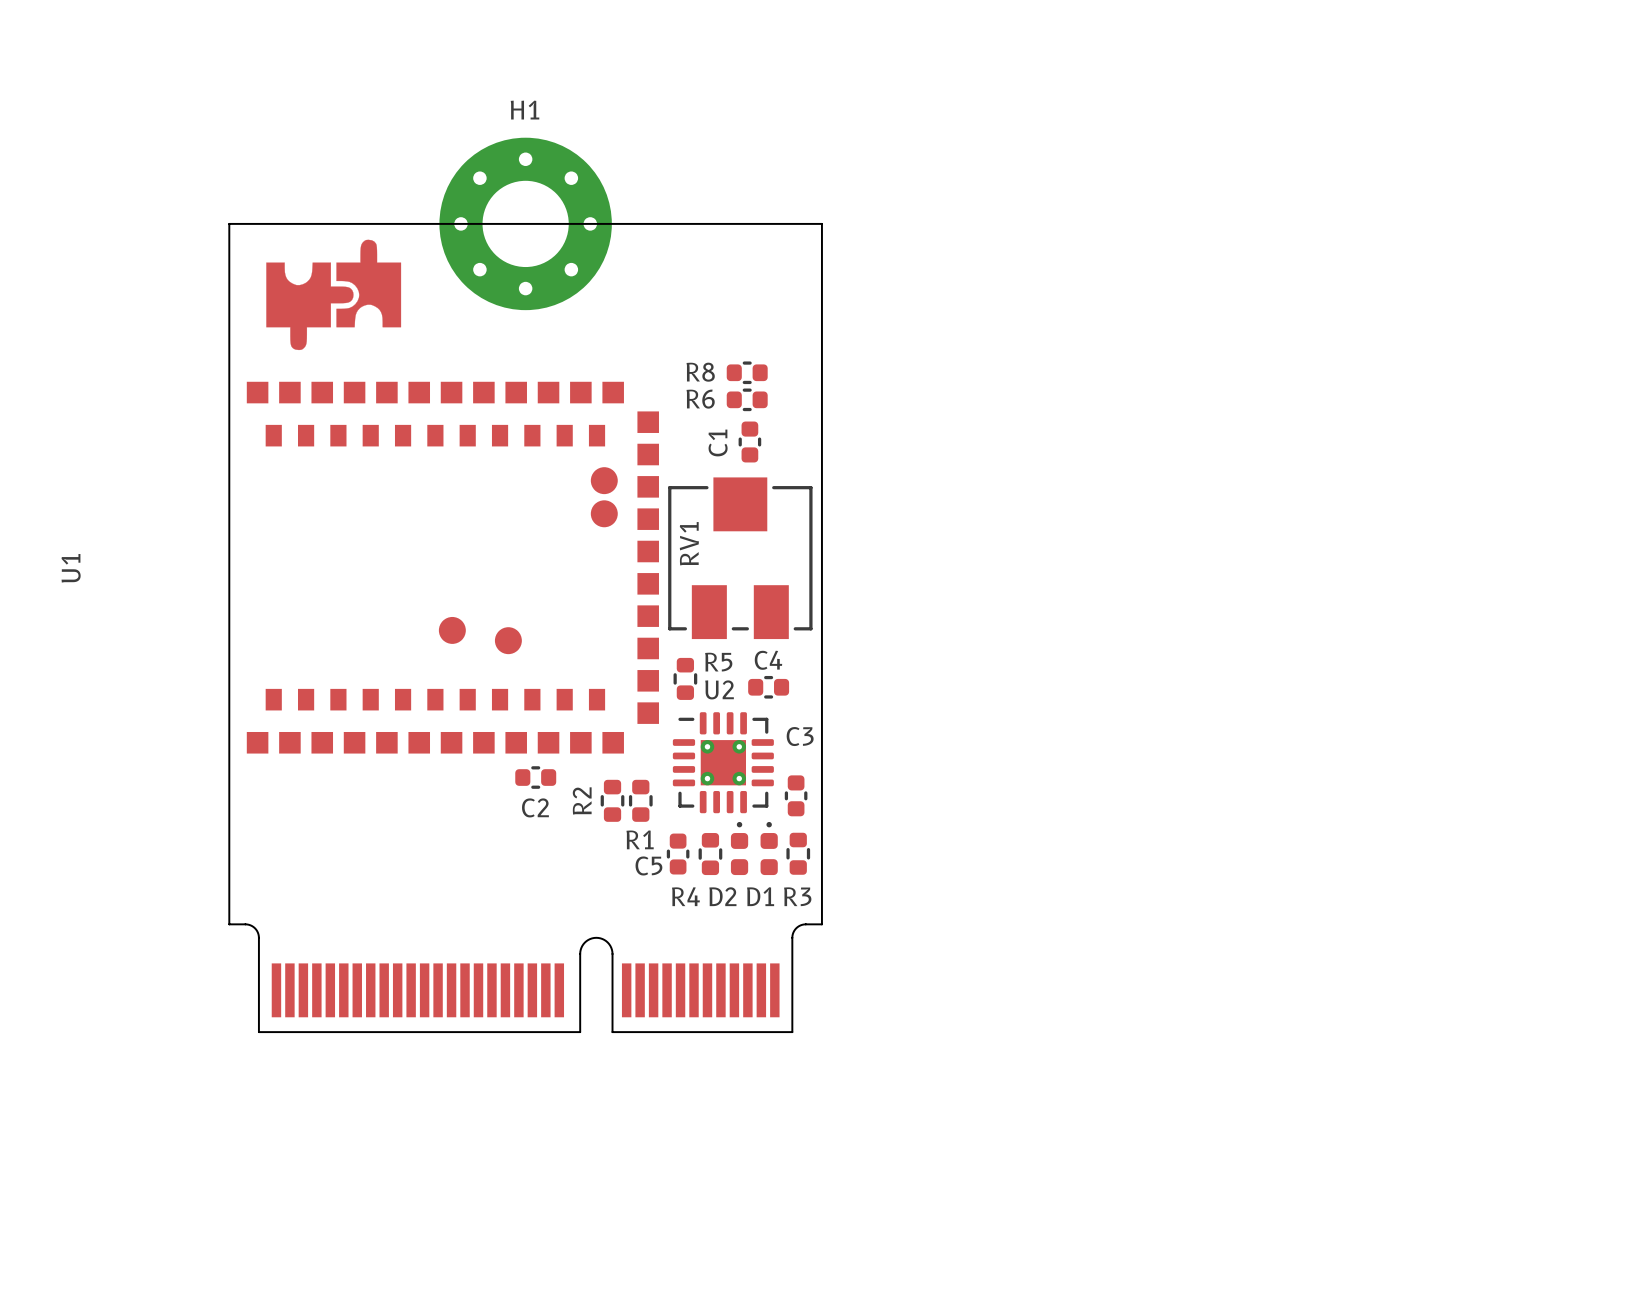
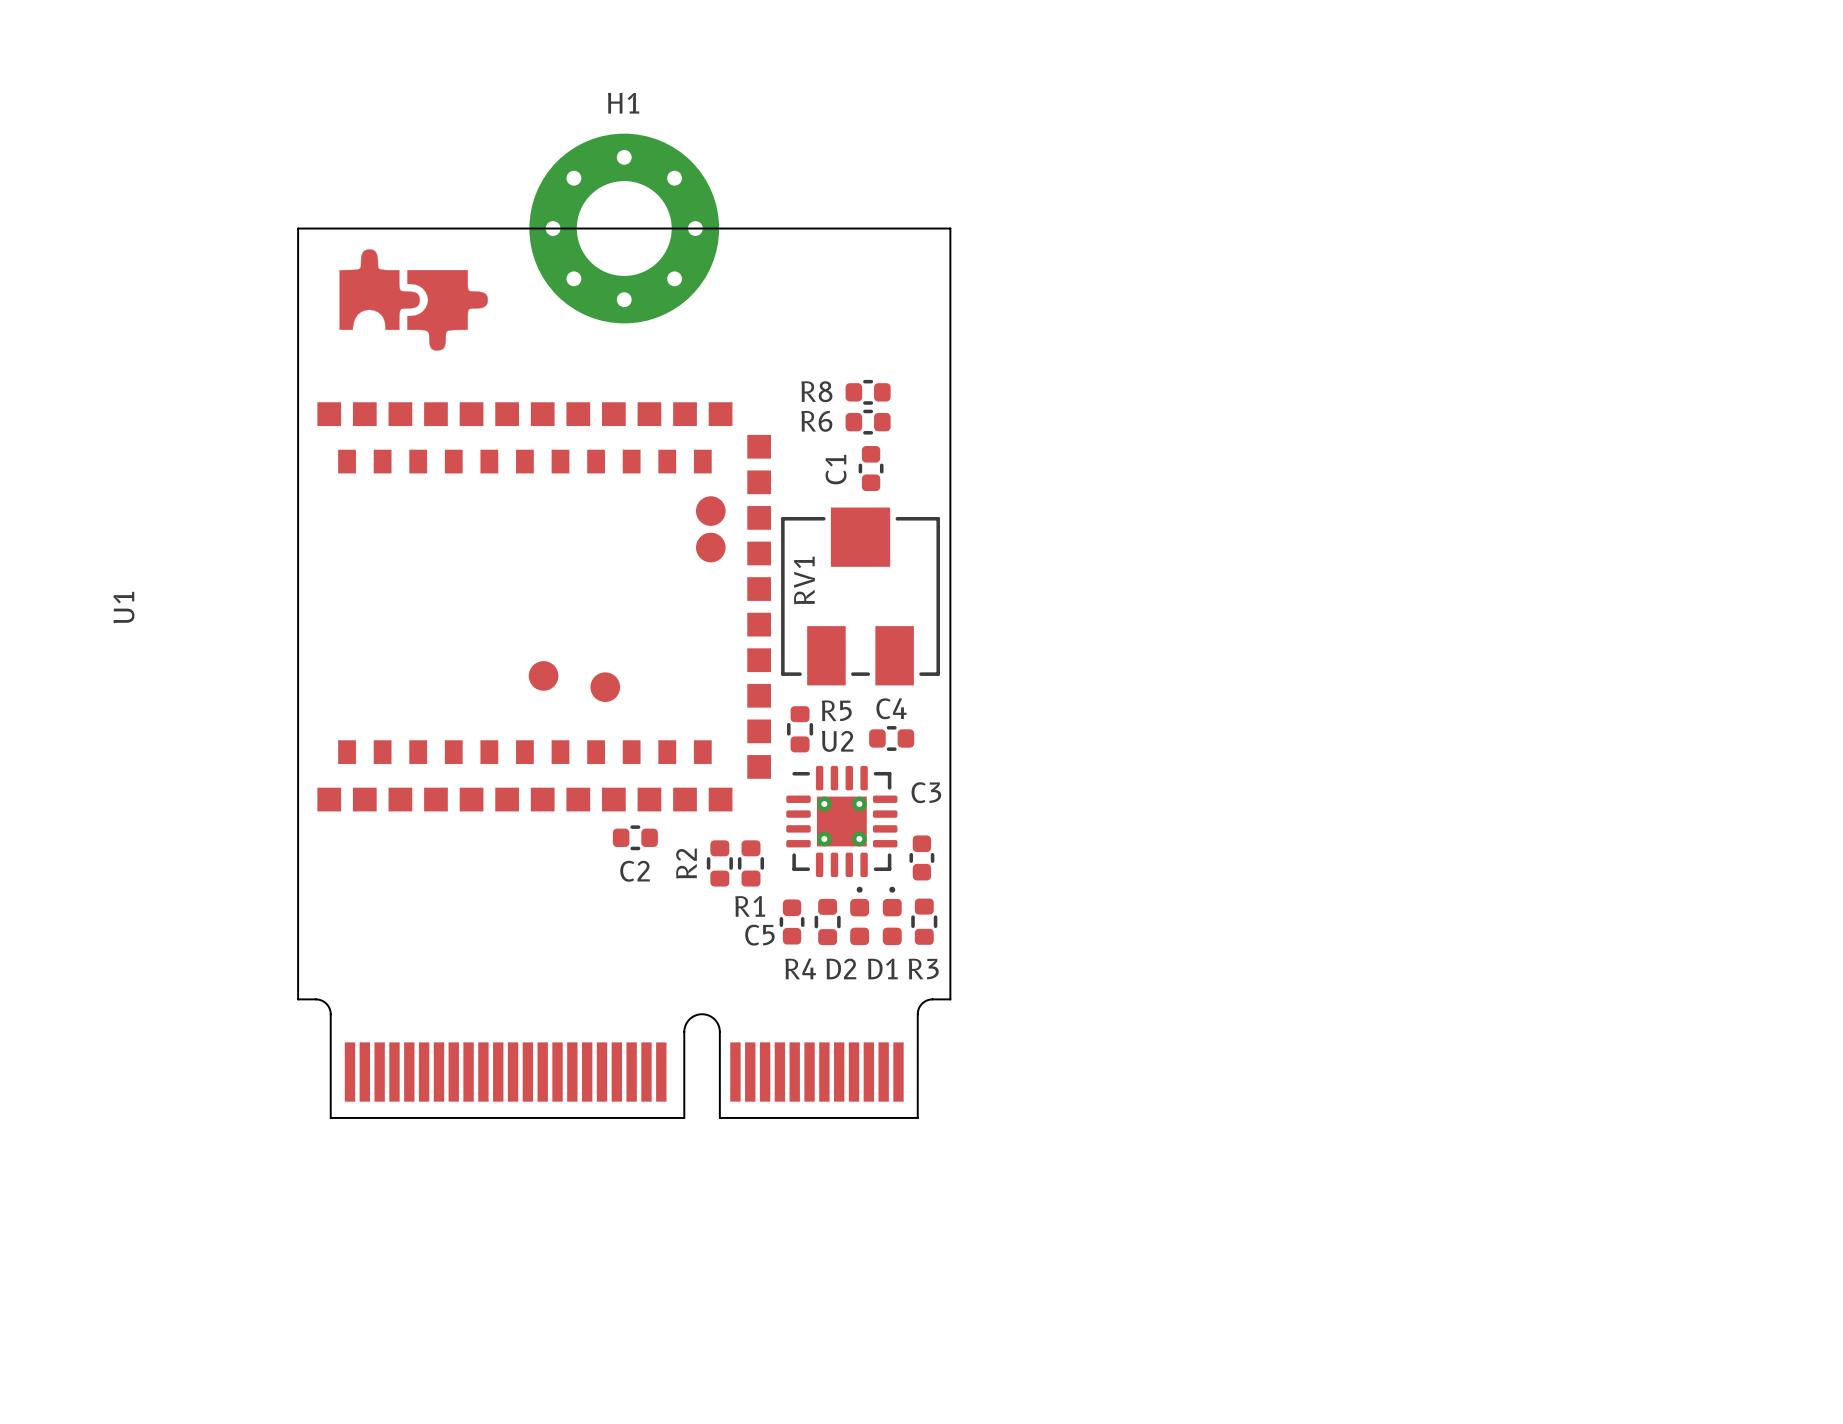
part footprint: [266, 239, 402, 351] -> [339, 249, 488, 351]

